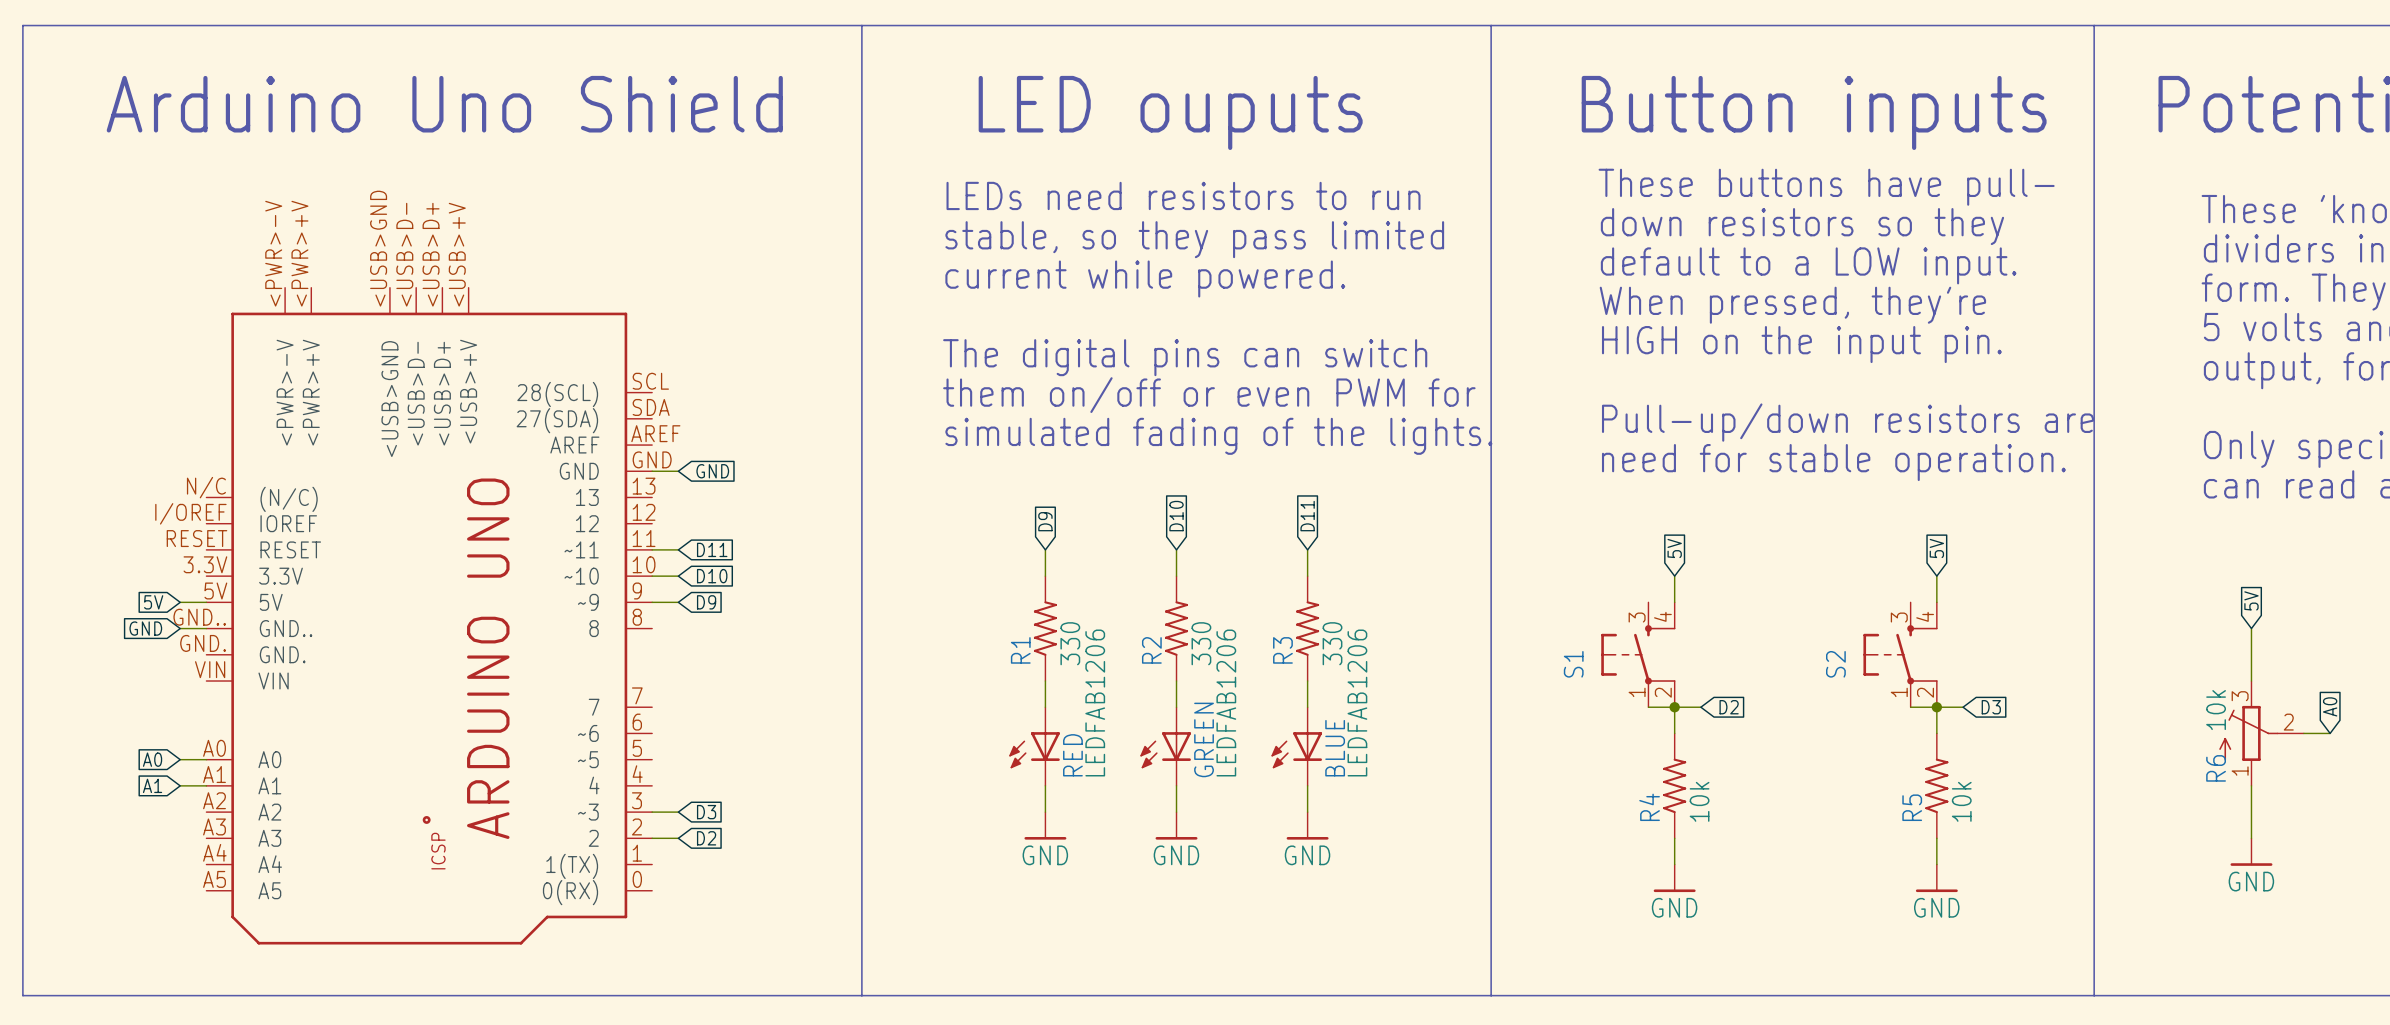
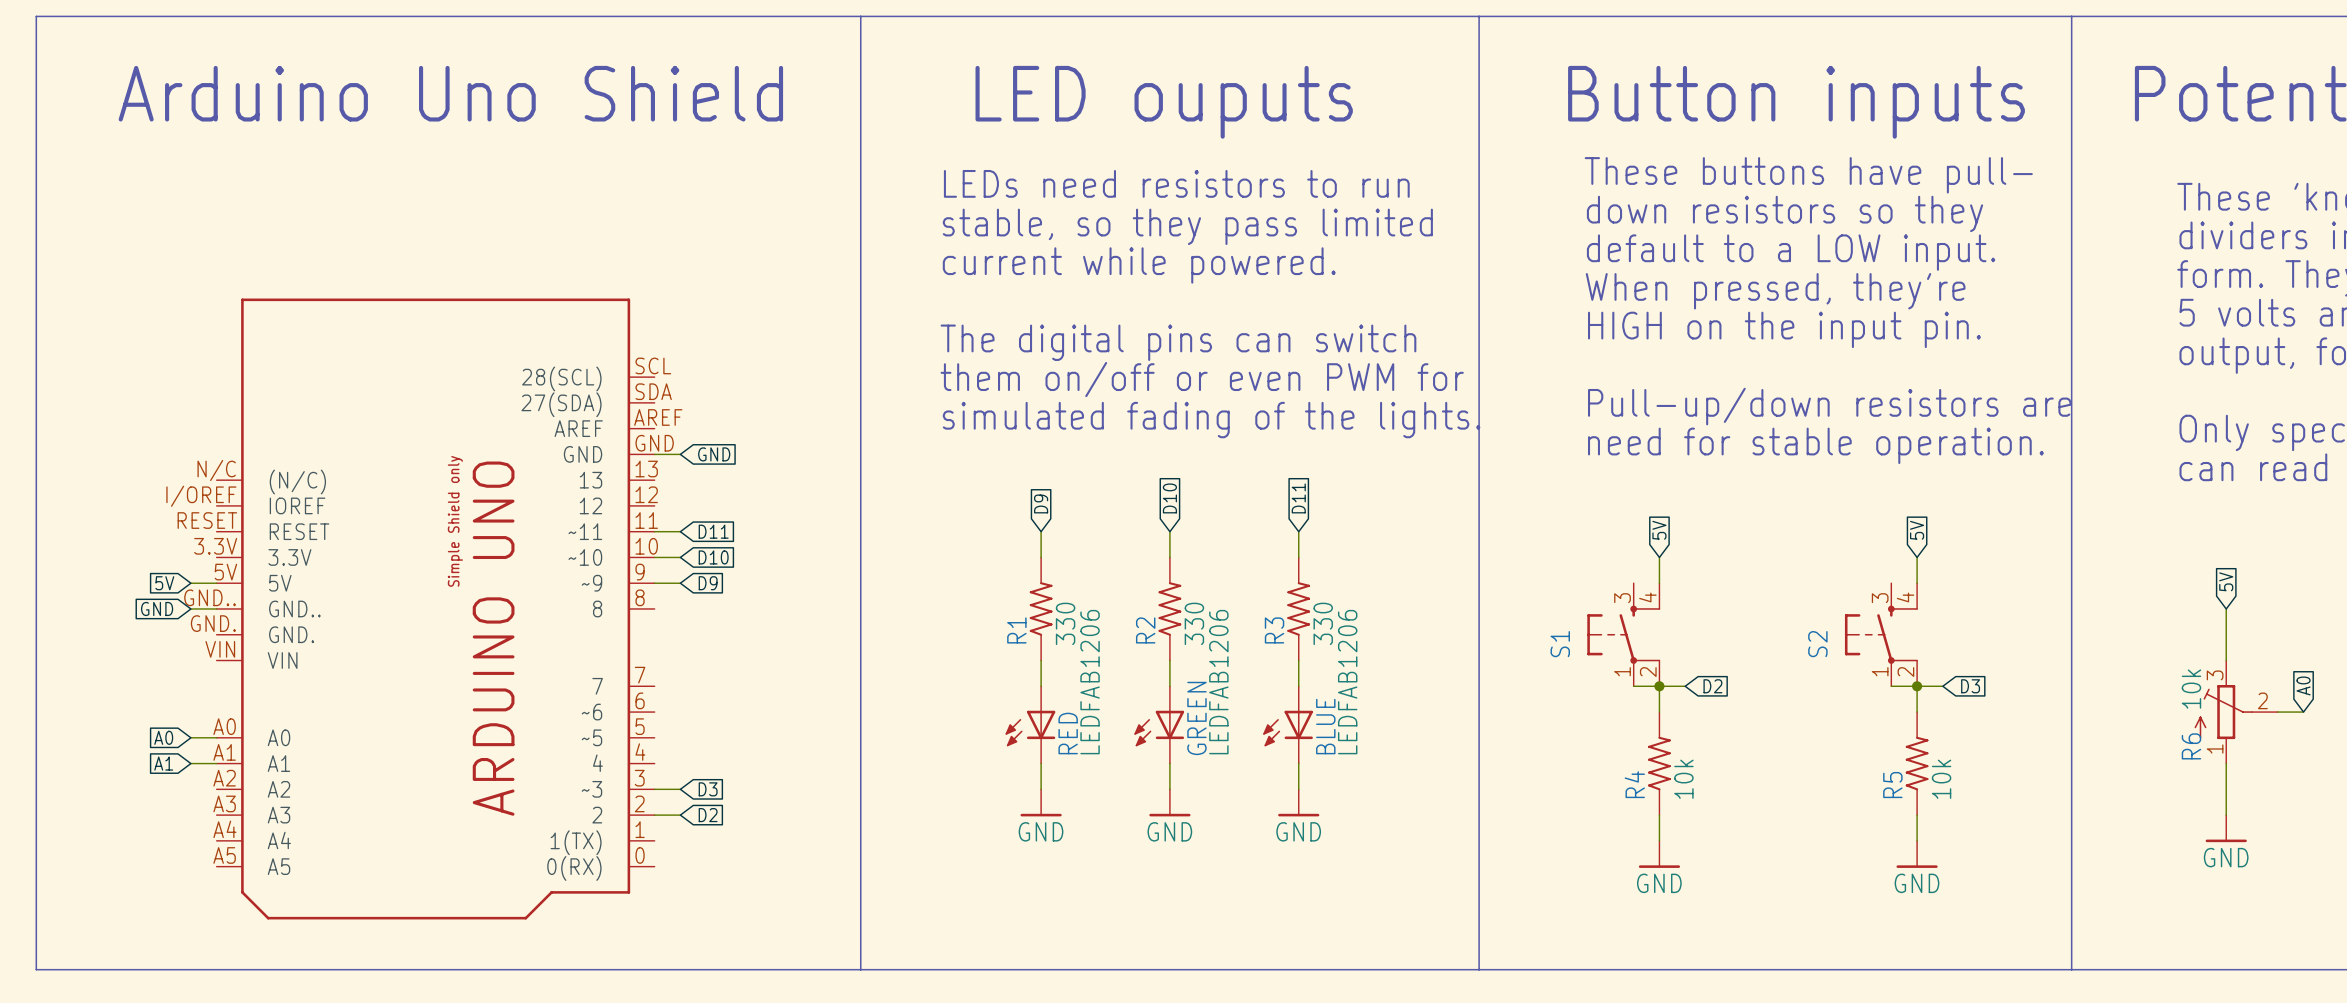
part: (429, 616) -> none
part: none -> (435, 608)

